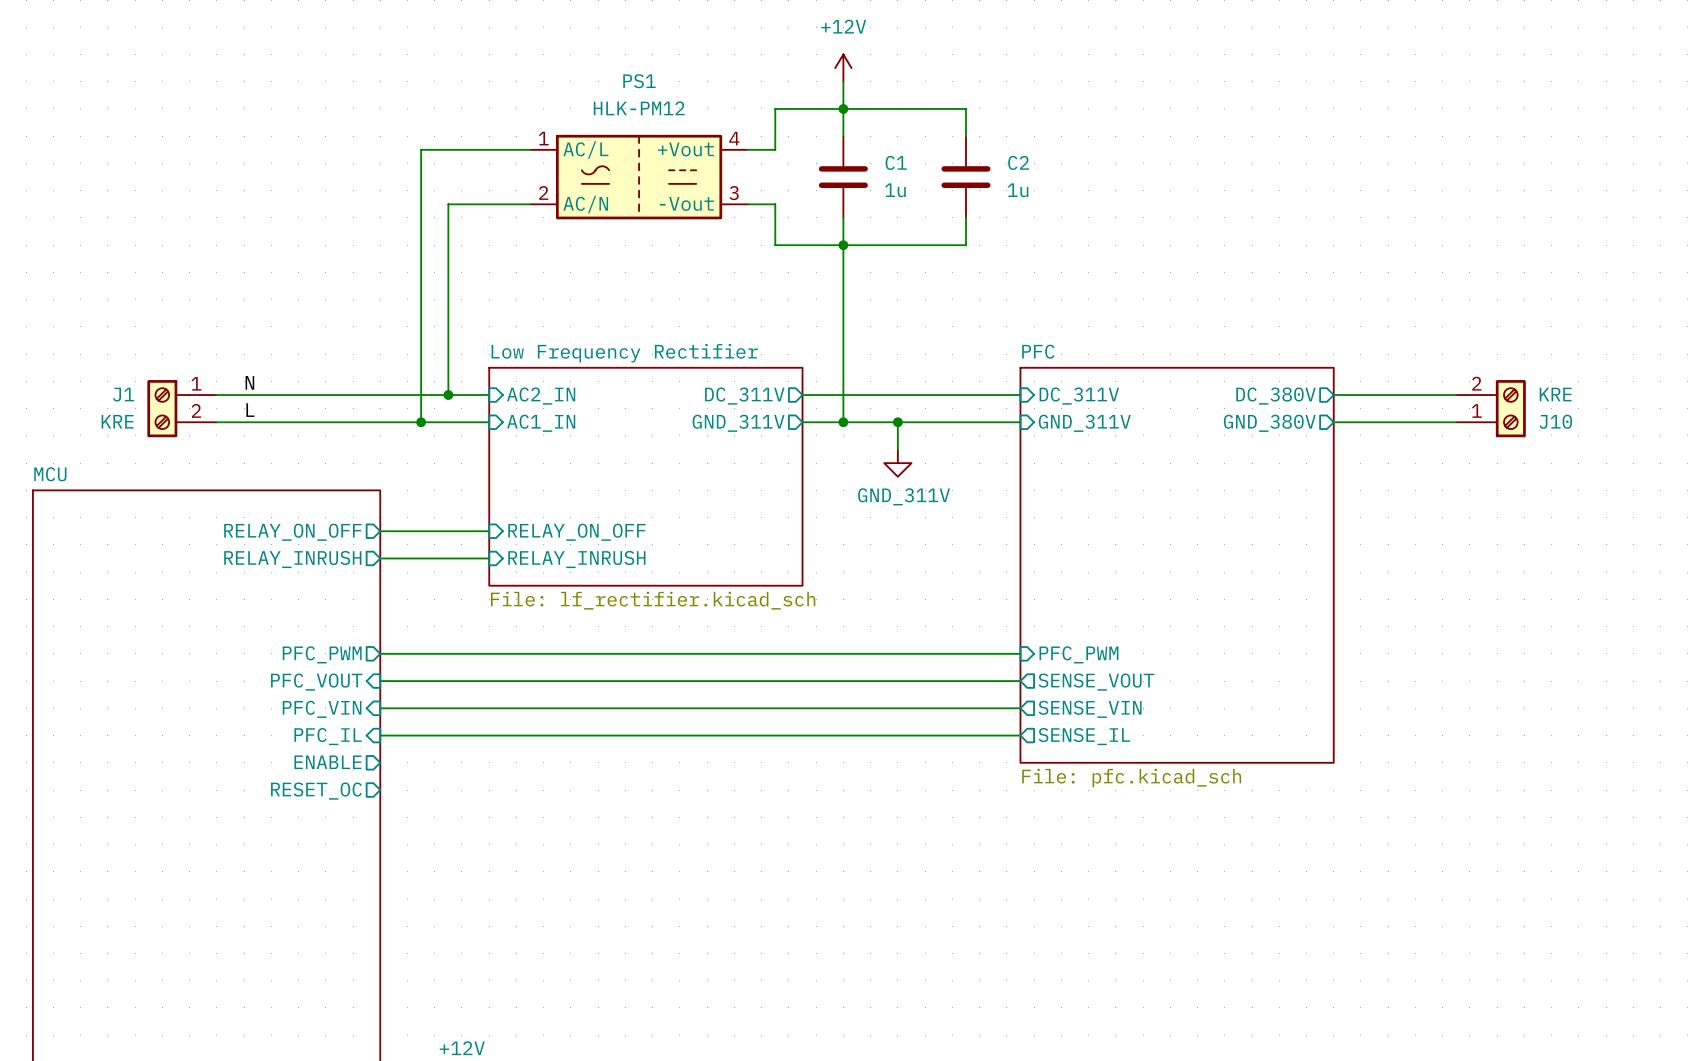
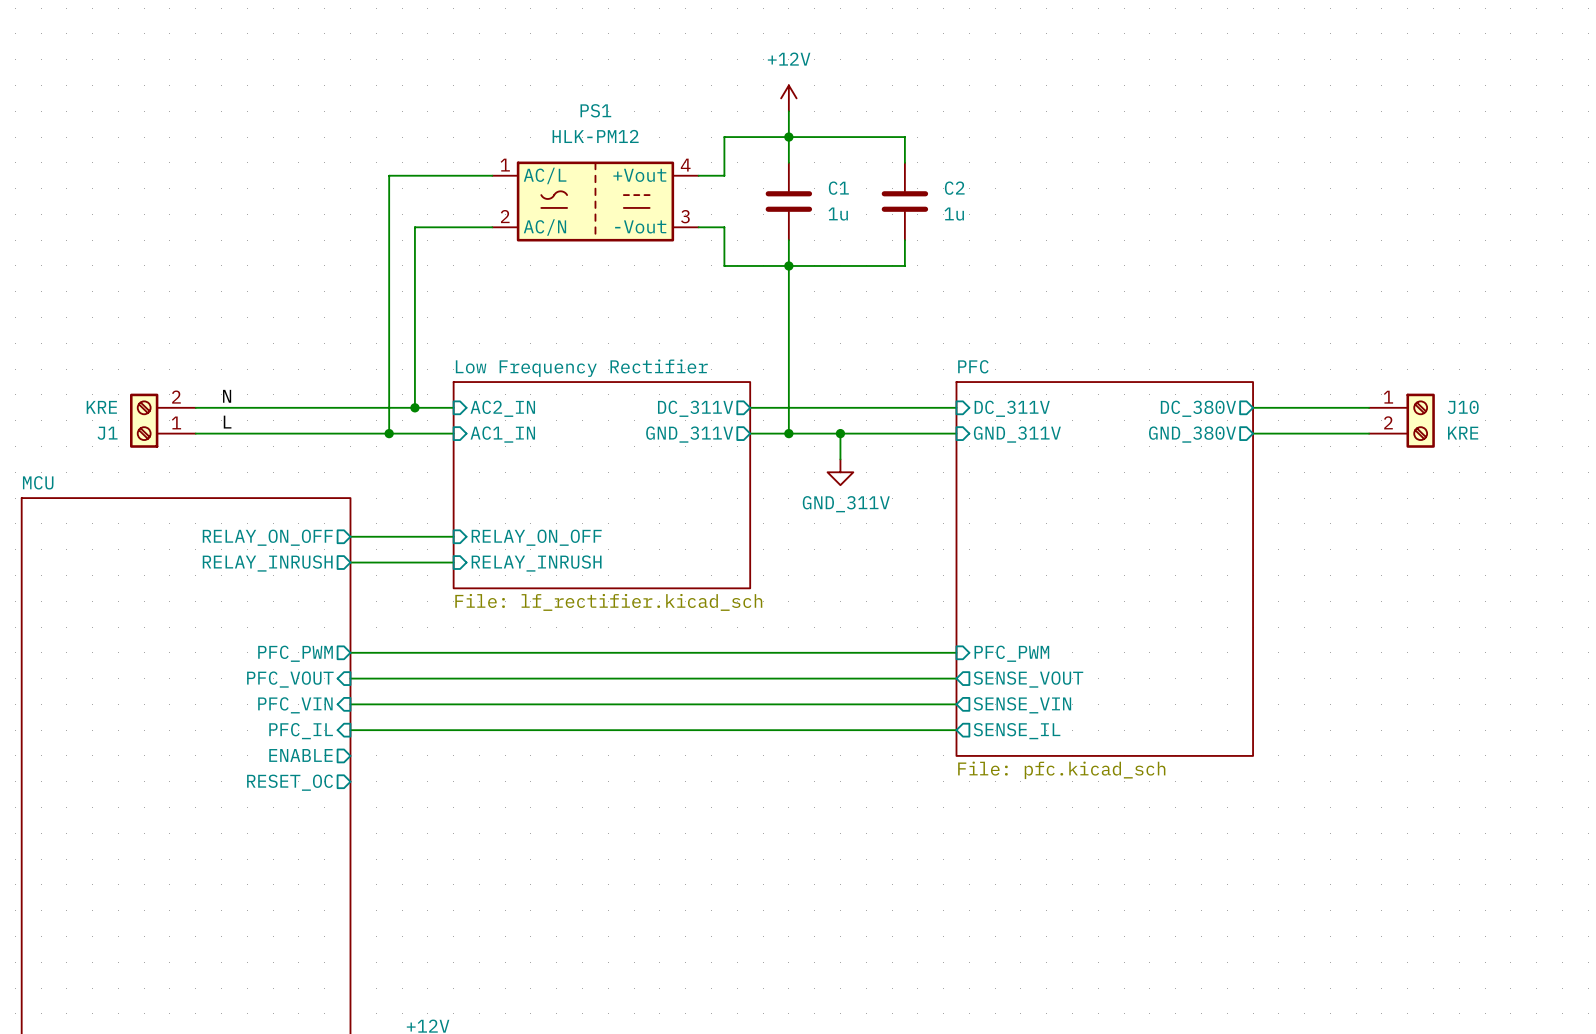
J1 flip: as is (162, 408) -> up-down (144, 420)
J10 flip: as is (1510, 408) -> up-down (1420, 420)

